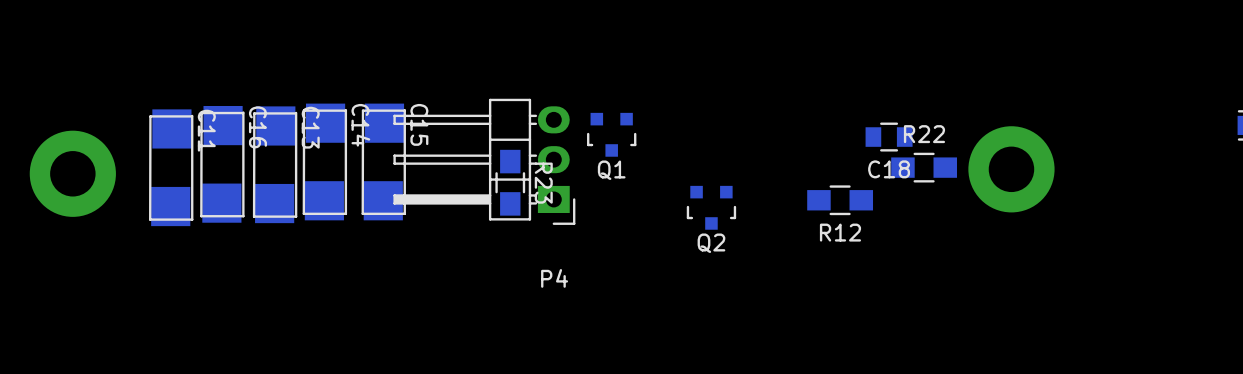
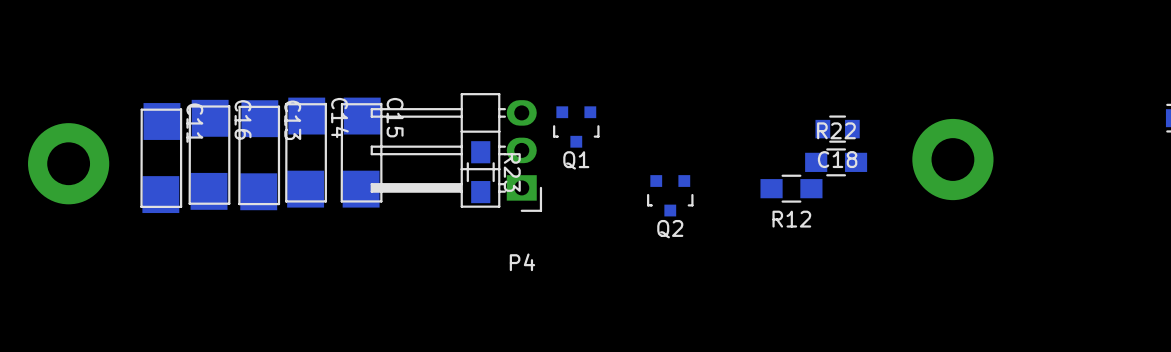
R22 position: (924, 167) -> (836, 162)

